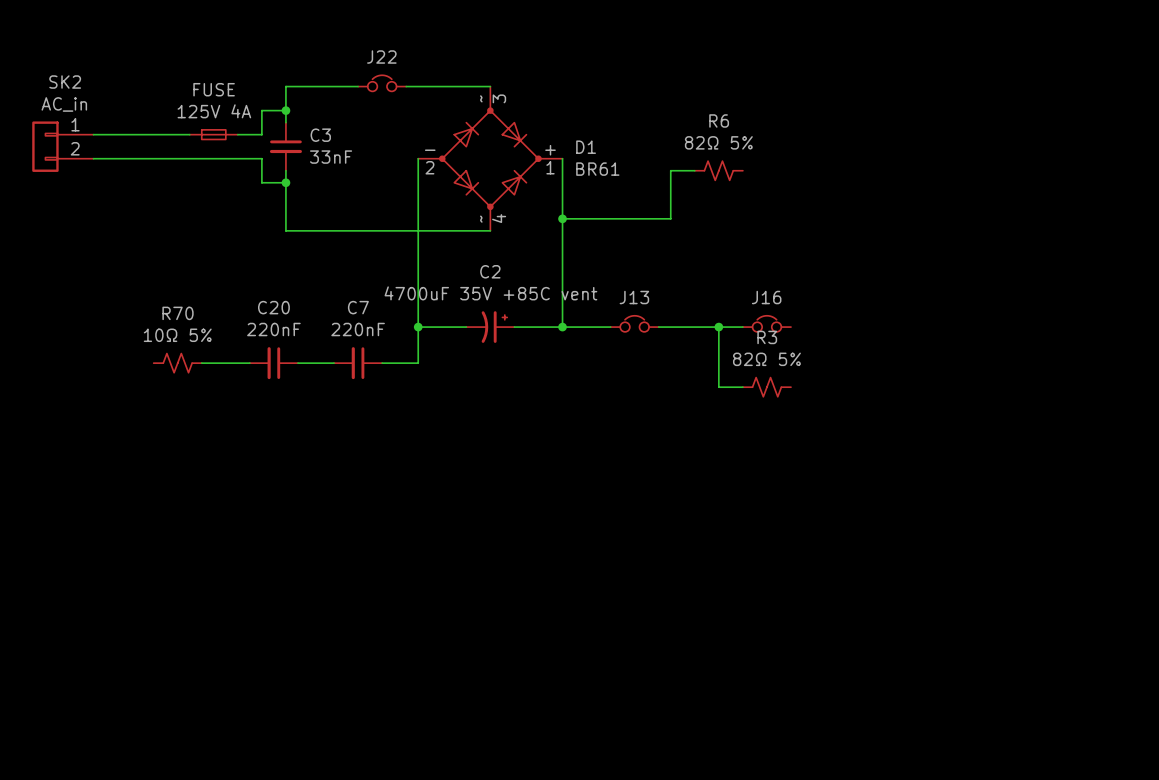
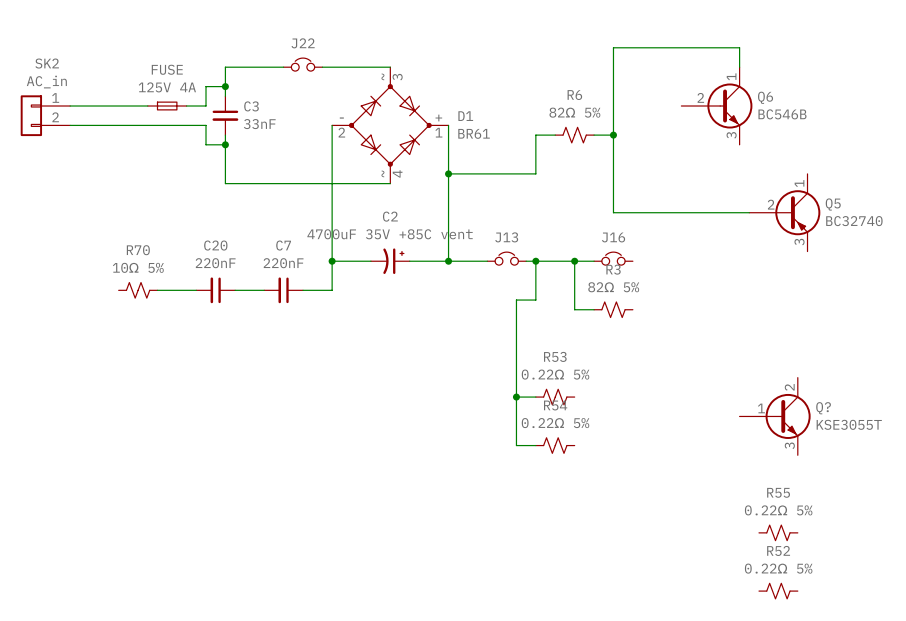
wire: none -> (739, 67) (739, 47) (613, 47) (613, 212) (749, 212)
Q6: none -> BC546B (716, 106)
wire: none -> (594, 135) (613, 135)
junction: none -> (613, 135)
Q5: none -> BC32740 (784, 212)
wire: none -> (535, 261) (535, 300) (516, 300) (516, 445) (535, 445)
junction: none -> (535, 261)
wire: none -> (516, 397) (535, 397)
junction: none -> (516, 397)
R53: none -> 0.22Ω 5% (555, 397)
Q?: none -> KSE3055T (775, 416)
R54: none -> 0.22Ω 5% (555, 445)
R55: none -> 0.22Ω 5% (778, 532)
R52: none -> 0.22Ω 5% (778, 591)

